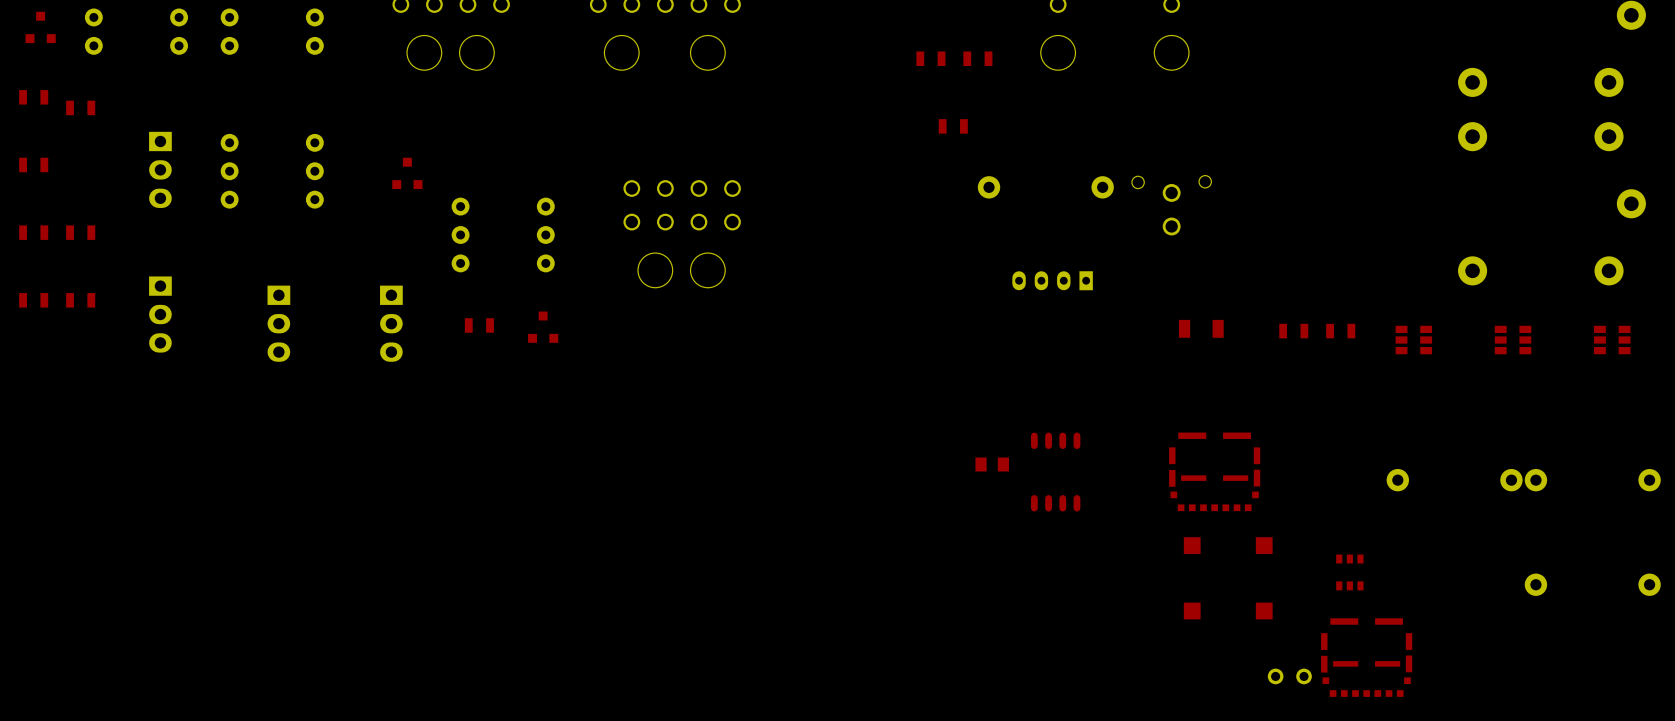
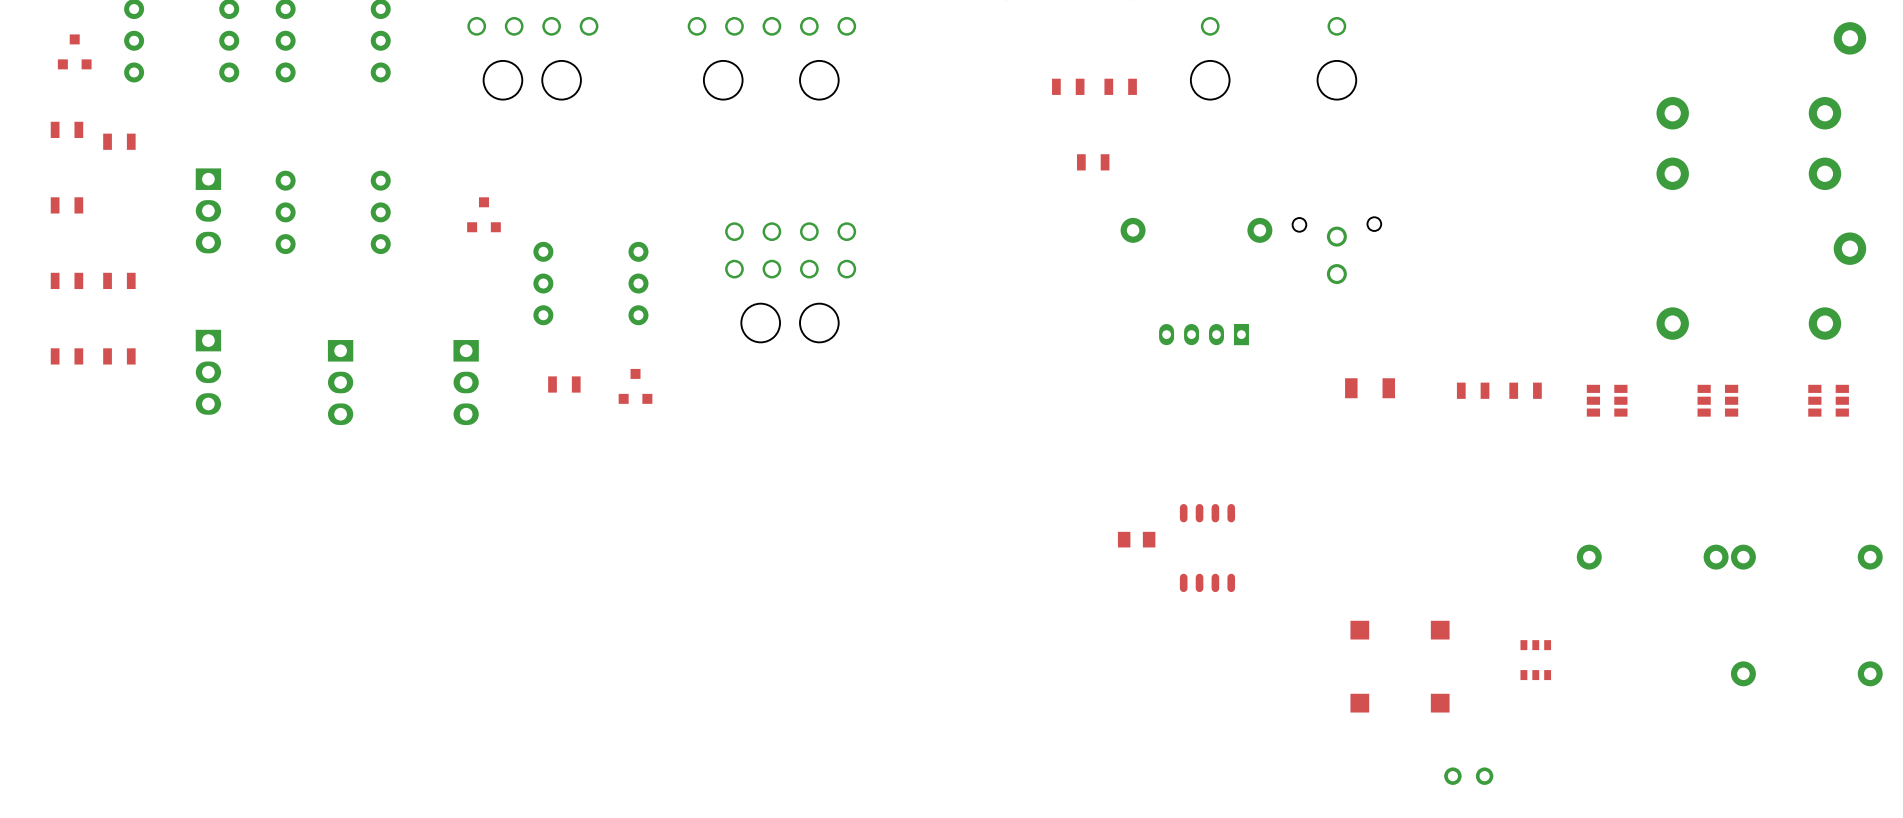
part: (1214, 471) -> none
part: (1366, 657) -> none

